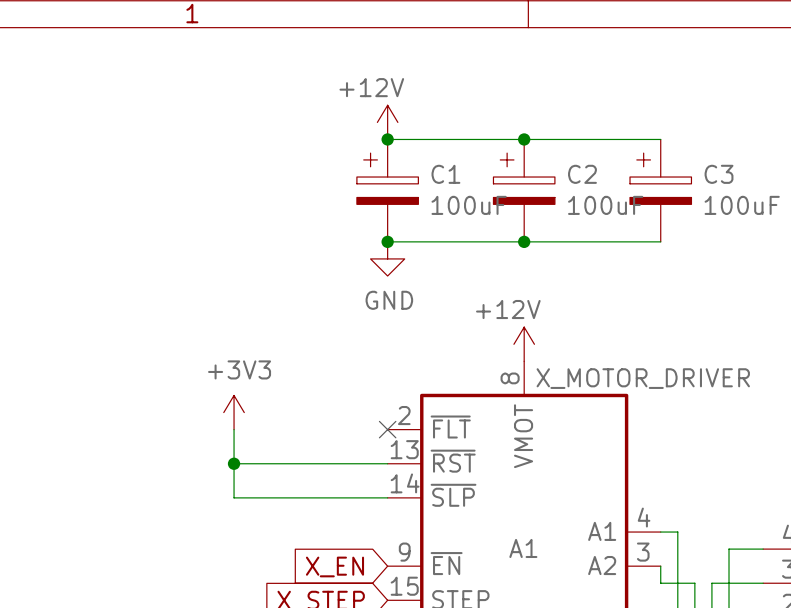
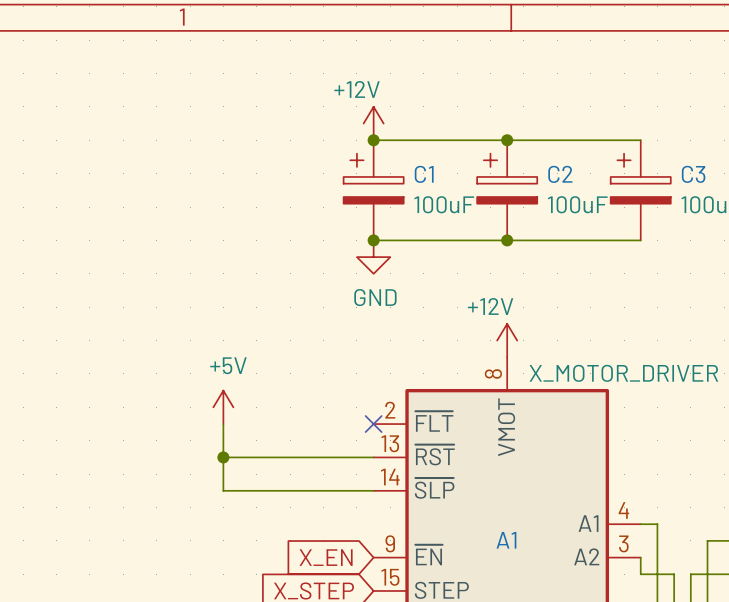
power symbol: +3V3 (234, 412) -> +5V (223, 407)

